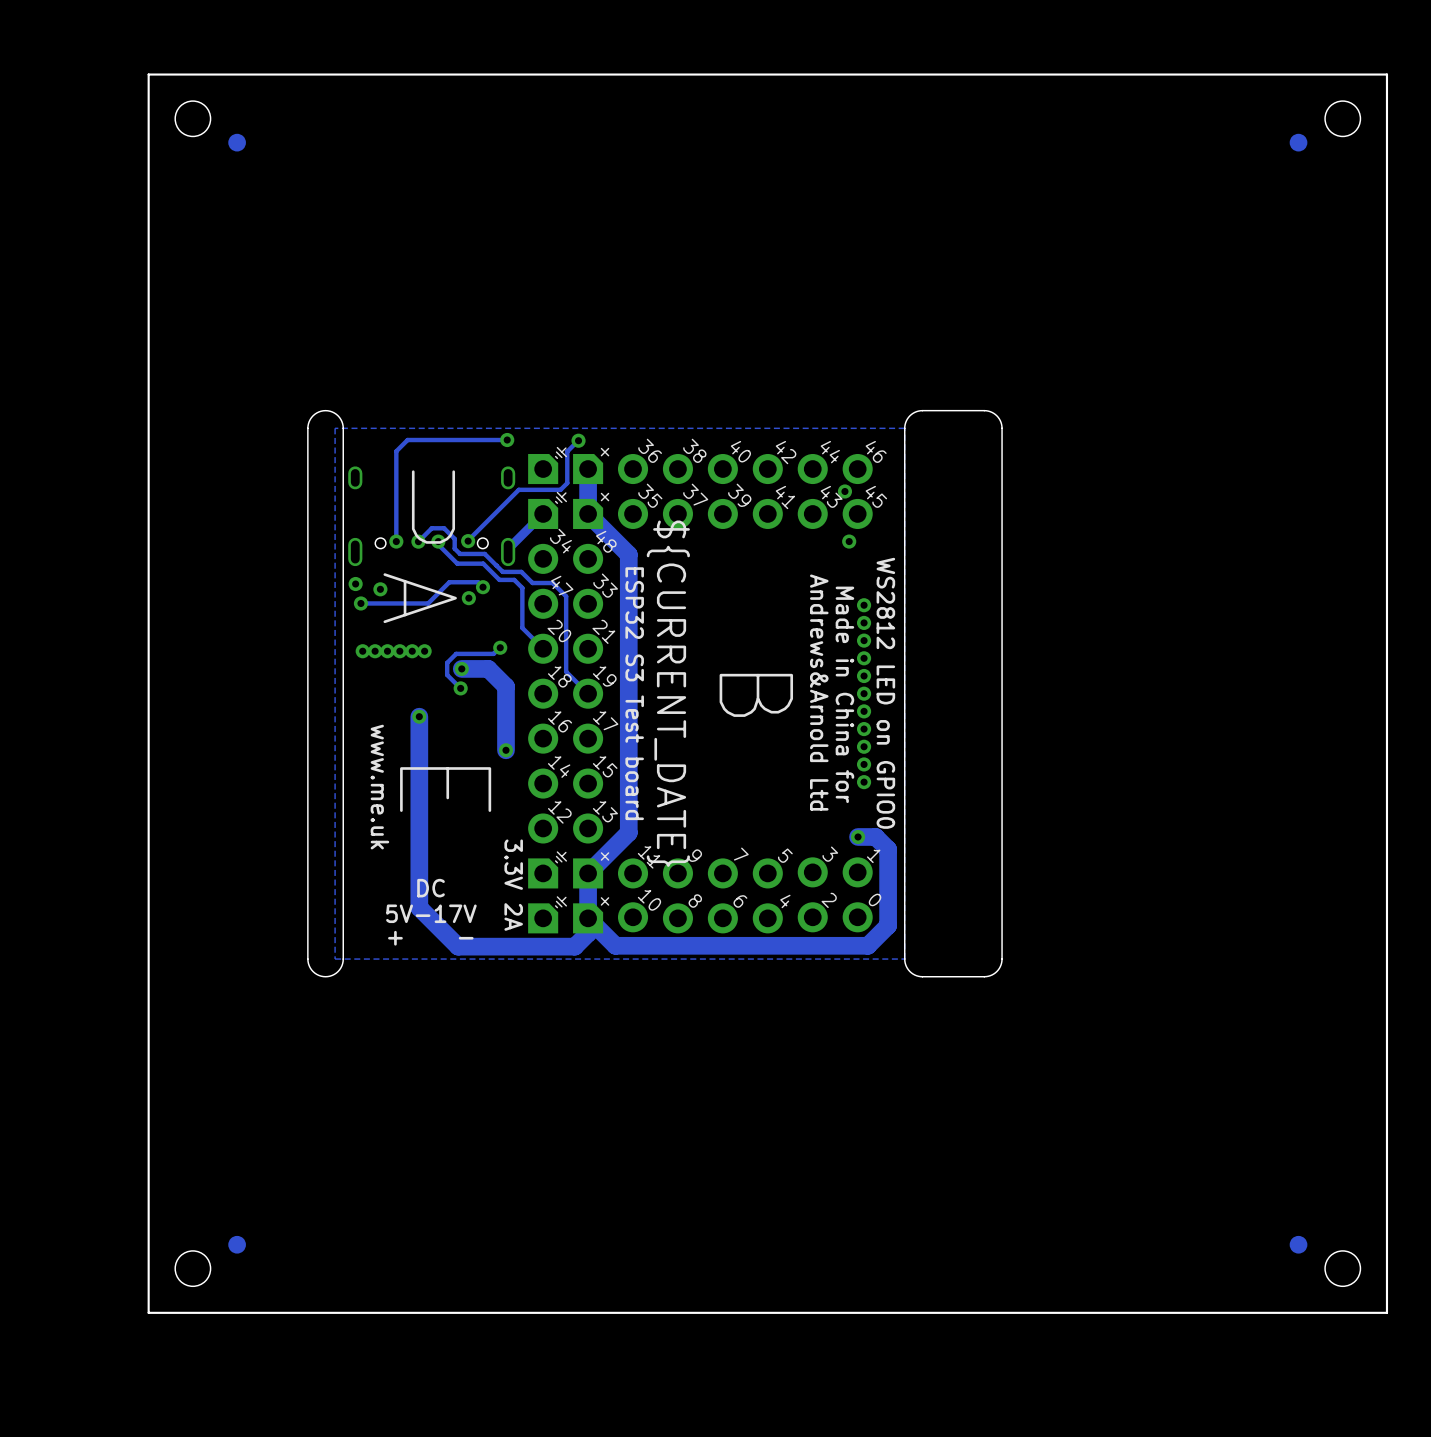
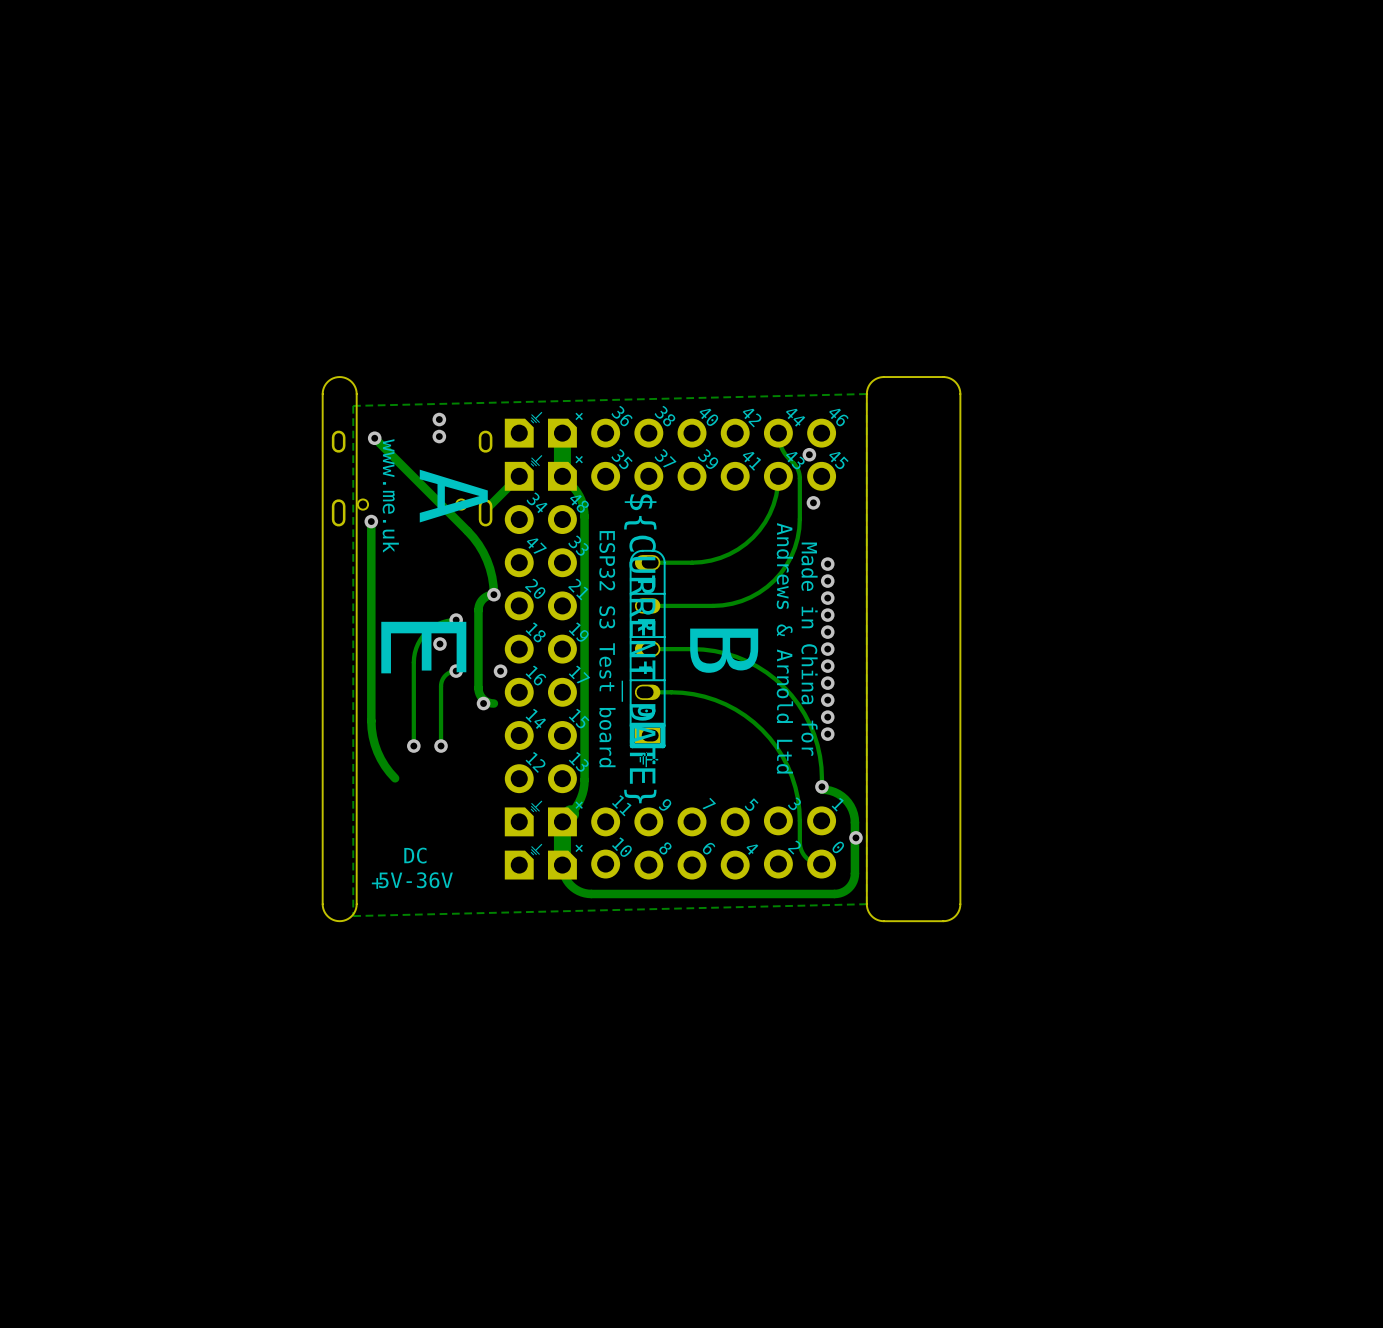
board edge: (343, 428) (343, 959) (338, 971) (325, 976) (313, 971) (307, 959) (307, 428) (313, 415) (325, 410) (338, 415) (343, 428) -> (356, 394) (356, 904) (351, 916) (339, 921) (327, 916) (322, 904) (322, 394) (327, 382) (339, 377) (351, 382) (356, 394)
zone outline: (904, 428) (335, 428) (335, 959) (904, 959) -> (866, 394) (353, 405) (353, 916) (866, 904)
track: (507, 440) (407, 440) (396, 451) (396, 541) -> none
via: (507, 440) -> none
track: (578, 440) (567, 451) (567, 483) (560, 489) (518, 489) (468, 541) -> none
via: (578, 440) -> none
via: none -> (439, 419)
track: none -> (778, 433) (782, 450) (796, 466) (799, 478) (797, 538) (791, 556) (780, 573) (759, 592) (732, 603) (712, 605) (645, 605)
via: none -> (439, 436)
track: none -> (374, 438) (467, 531) (478, 544) (487, 560) (492, 577) (493, 594) (484, 597) (478, 608) (478, 688) (482, 698) (493, 703)
via: none -> (374, 438)
text: U (433, 507) -> none
track: (588, 513) (628, 554) (628, 832) (596, 864) -> (571, 485) (581, 499) (584, 516) (584, 780) (580, 798) (570, 813)
track: none -> (778, 476) (776, 495) (765, 522) (753, 537) (737, 549) (720, 557) (701, 562) (650, 562)
via: (396, 541) -> none
track: (418, 541) (431, 528) (444, 528) (454, 538) (454, 548) (460, 553) (484, 553) (502, 571) (521, 571) (532, 583) (552, 583) (566, 596) (566, 671) (588, 693) -> none
via: (418, 541) -> none
track: (438, 541) (438, 544) (457, 563) (483, 563) (499, 579) (514, 579) (522, 587) (522, 627) (543, 648) -> none
via: (438, 541) -> none
via: (468, 541) -> none
track: none -> (371, 521) (371, 728) (377, 751) (385, 766) (395, 778)
via: none -> (371, 521)
via: (355, 584) -> none
track: (483, 587) (478, 582) (449, 582) (428, 603) (360, 603) -> none
via: (483, 587) -> none
via: (380, 589) -> none
text position: A (420, 598) -> A (453, 496)
via: (468, 598) -> none
via: (360, 603) -> none
via: none -> (493, 594)
track: (500, 647) (493, 653) (456, 653) (447, 662) (447, 674) (460, 688) -> none
via: (500, 647) -> none
via: (362, 651) -> none
via: (375, 651) -> none
via: (387, 651) -> none
via: (399, 651) -> none
via: (412, 651) -> none
via: (424, 651) -> none
track: none -> (456, 620) (446, 621) (433, 626) (423, 636) (416, 648) (413, 662) (413, 746)
via: none -> (456, 620)
track: (461, 668) (488, 668) (506, 686) (506, 750) -> none
via: (461, 668) -> none
text: Andrews&Arnold Ltd (819, 692) -> Andrews & Arnold Ltd (784, 648)
part: none -> (647, 649)
track: none -> (650, 649) (703, 649) (736, 656) (766, 672) (791, 695) (804, 713) (814, 734) (819, 756) (821, 789) (834, 792) (842, 796) (850, 806) (853, 814) (854, 873) (853, 881) (844, 891) (834, 893) (591, 893) (581, 892) (570, 885) (564, 874) (562, 865)
part: (767, 693) -> none
text: WS2812 LED on GPIO0 (885, 693) -> none
track: (419, 716) (419, 907) (458, 946) (574, 946) (588, 933) (588, 918) (615, 945) (867, 945) (888, 925) (888, 849) (875, 836) (858, 836) -> none
via: (419, 716) -> none
track: none -> (456, 671) (446, 674) (441, 682) (441, 746)
via: none -> (456, 671)
via: none -> (500, 671)
track: none -> (645, 692) (682, 692) (715, 700) (735, 709) (762, 729) (782, 756) (792, 776) (797, 798) (802, 851) (810, 860) (821, 864)
text position: www.me.uk (379, 787) -> www.me.uk (390, 495)
text position: E (445, 789) -> E (423, 647)
via: none -> (413, 746)
via: none -> (441, 746)
text: 3.3V 2A (513, 885) -> none
text position: DC (431, 888) -> DC (415, 855)
via: none -> (855, 837)
text: 5V-17V (431, 913) -> 5V-36V (415, 880)
text: - (466, 938) -> none

